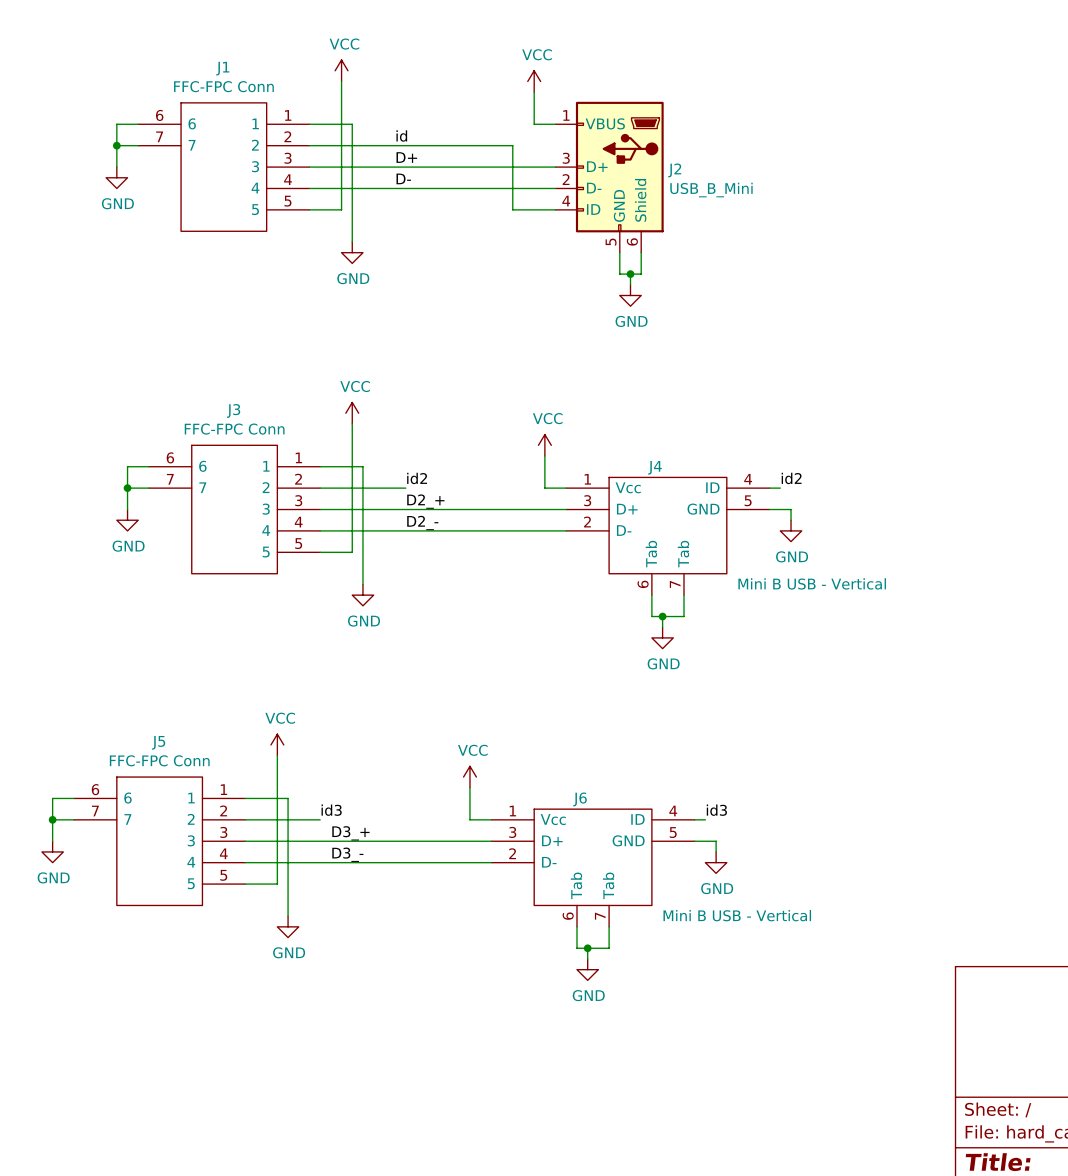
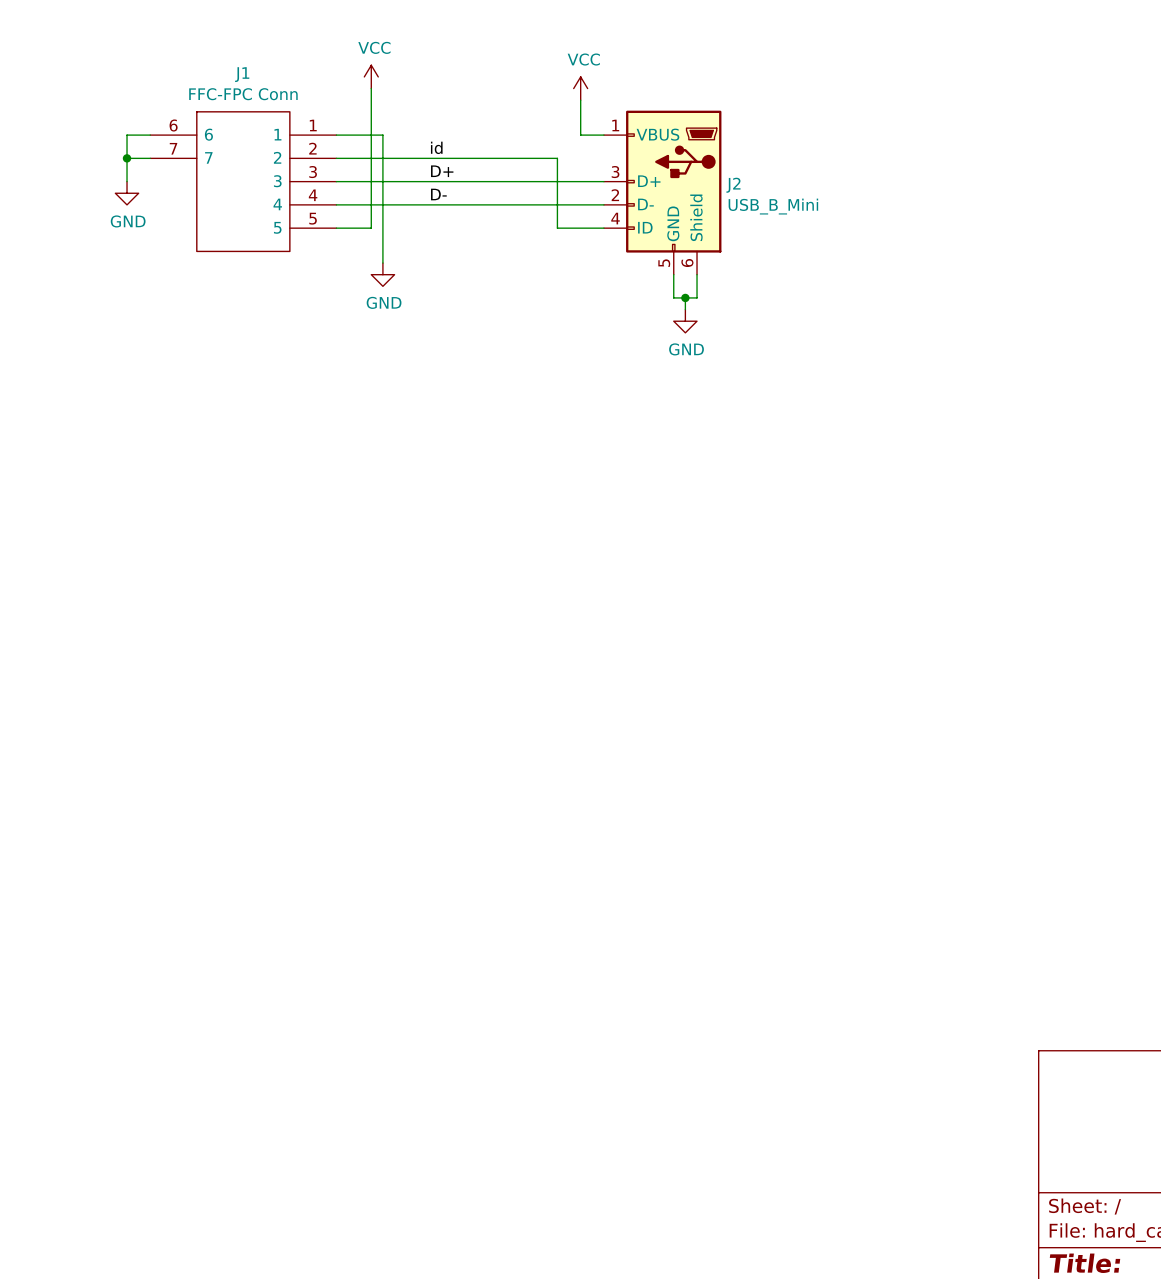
power symbol: VCC (352, 413) -> none
wire: (352, 423) (352, 552) (320, 552) -> none
power symbol: VCC (544, 445) -> none
wire: (544, 456) (544, 488) (566, 488) -> none
wire: (148, 466) (127, 466) (127, 509) -> none
wire: (320, 466) (362, 466) (362, 584) -> none
label: id2 (417, 478) -> none
label: id2 (791, 478) -> none
wire: (127, 488) (148, 488) -> none
junction: (127, 488) -> none
wire: (320, 488) (405, 488) -> none
wire: (769, 488) (780, 488) -> none
label: D2_+ (425, 501) -> none
J3: FFC-FPC Conn (234, 509) -> none
wire: (320, 509) (566, 509) -> none
wire: (769, 509) (791, 509) (791, 520) -> none
power symbol: GND (127, 520) -> none
label: D2_- (422, 523) -> none
wire: (320, 530) (566, 530) -> none
power symbol: GND (791, 530) -> none
J4: Mini B USB - Vertical (667, 536) -> none
power symbol: GND (362, 595) -> none
wire: (651, 595) (651, 616) (684, 616) (684, 595) -> none
wire: (662, 616) (662, 627) -> none
junction: (662, 616) -> none
power symbol: GND (662, 637) -> none
power symbol: VCC (277, 744) -> none
wire: (277, 755) (277, 884) (245, 884) -> none
power symbol: VCC (469, 777) -> none
wire: (469, 787) (469, 819) (491, 819) -> none
wire: (74, 798) (52, 798) (52, 841) -> none
wire: (245, 798) (288, 798) (288, 916) -> none
label: id3 (331, 810) -> none
label: id3 (716, 810) -> none
wire: (52, 819) (74, 819) -> none
junction: (52, 819) -> none
wire: (245, 819) (320, 819) -> none
wire: (694, 819) (705, 819) -> none
label: D3_+ (350, 833) -> none
J5: FFC-FPC Conn (159, 841) -> none
wire: (245, 841) (491, 841) -> none
wire: (694, 841) (716, 841) (716, 851) -> none
power symbol: GND (52, 851) -> none
label: D3_- (347, 854) -> none
wire: (245, 862) (491, 862) -> none
power symbol: GND (716, 862) -> none
J6: Mini B USB - Vertical (593, 868) -> none
power symbol: GND (288, 926) -> none
wire: (576, 926) (576, 948) (609, 948) (609, 926) -> none
wire: (587, 948) (587, 958) -> none
junction: (587, 948) -> none
power symbol: GND (587, 969) -> none

